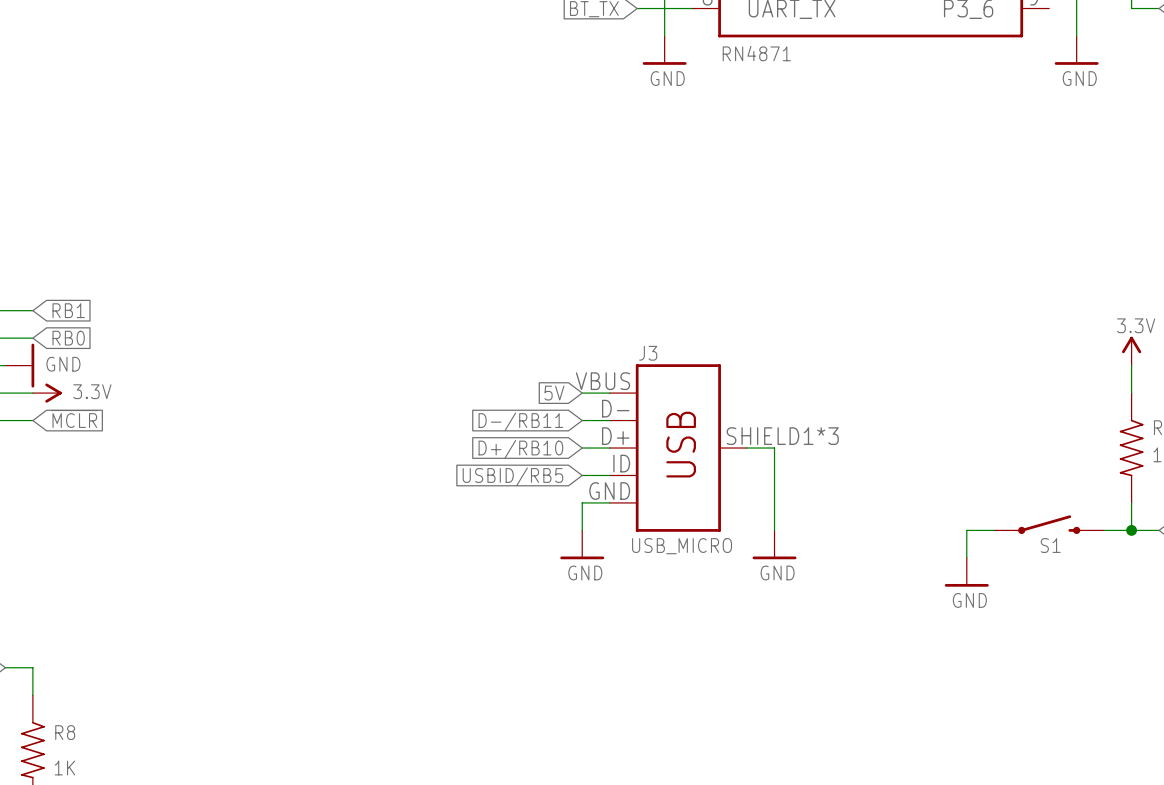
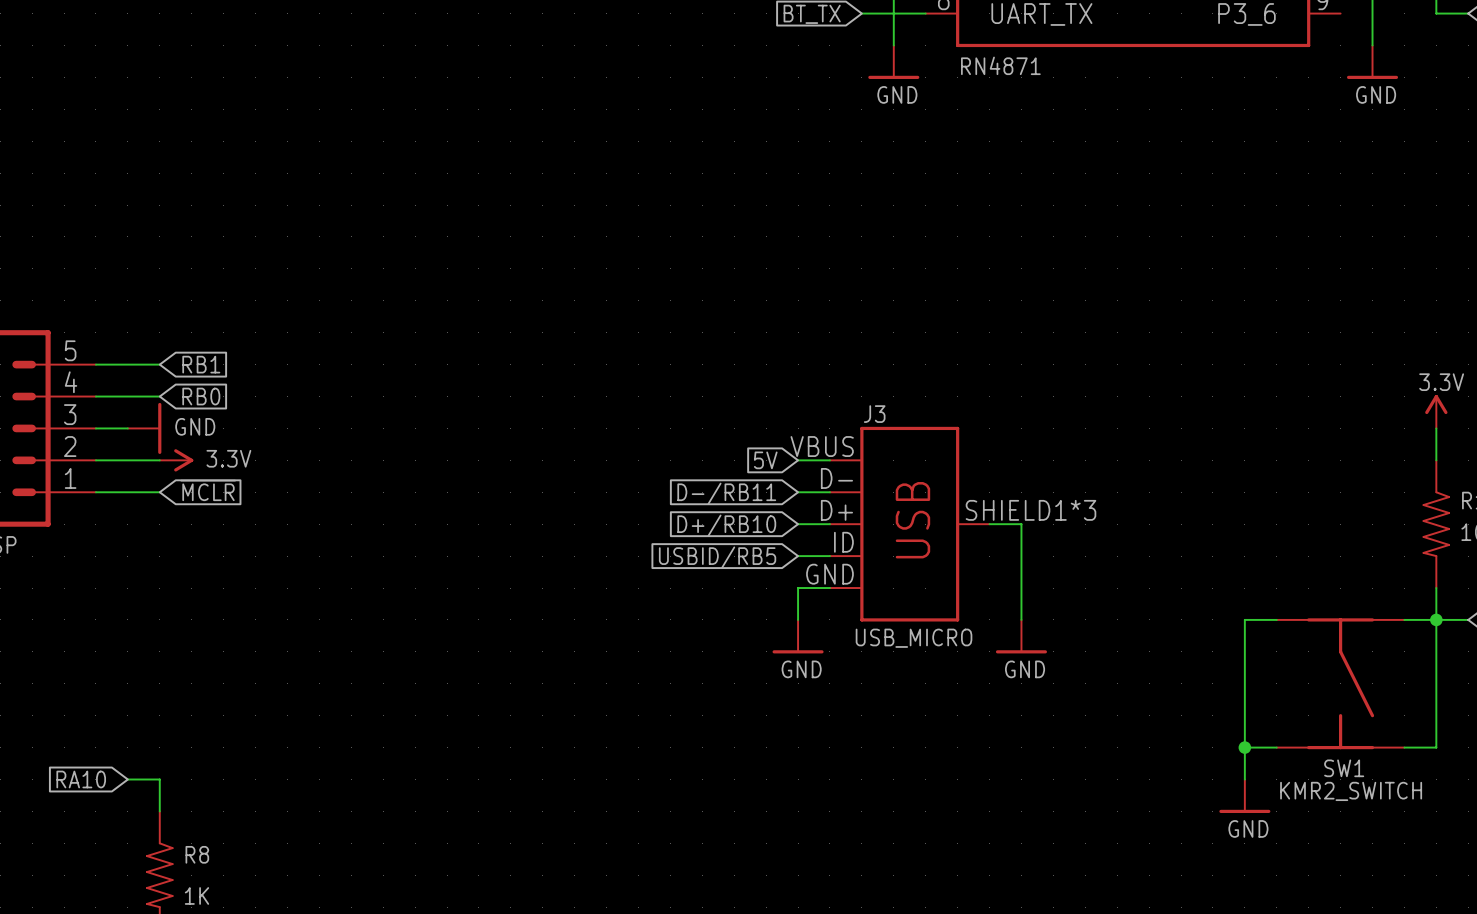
S1: (1049, 524) -> none
wire: none -> (1436, 619) (1436, 747) (1404, 747)
wire: none -> (1244, 651) (1244, 779)
power symbol position: GND (966, 572) -> GND (1244, 796)
SW1: none -> KMR2_SWITCH (1340, 683)
wire: none -> (1244, 747) (1276, 747)
junction: none -> (1244, 747)

